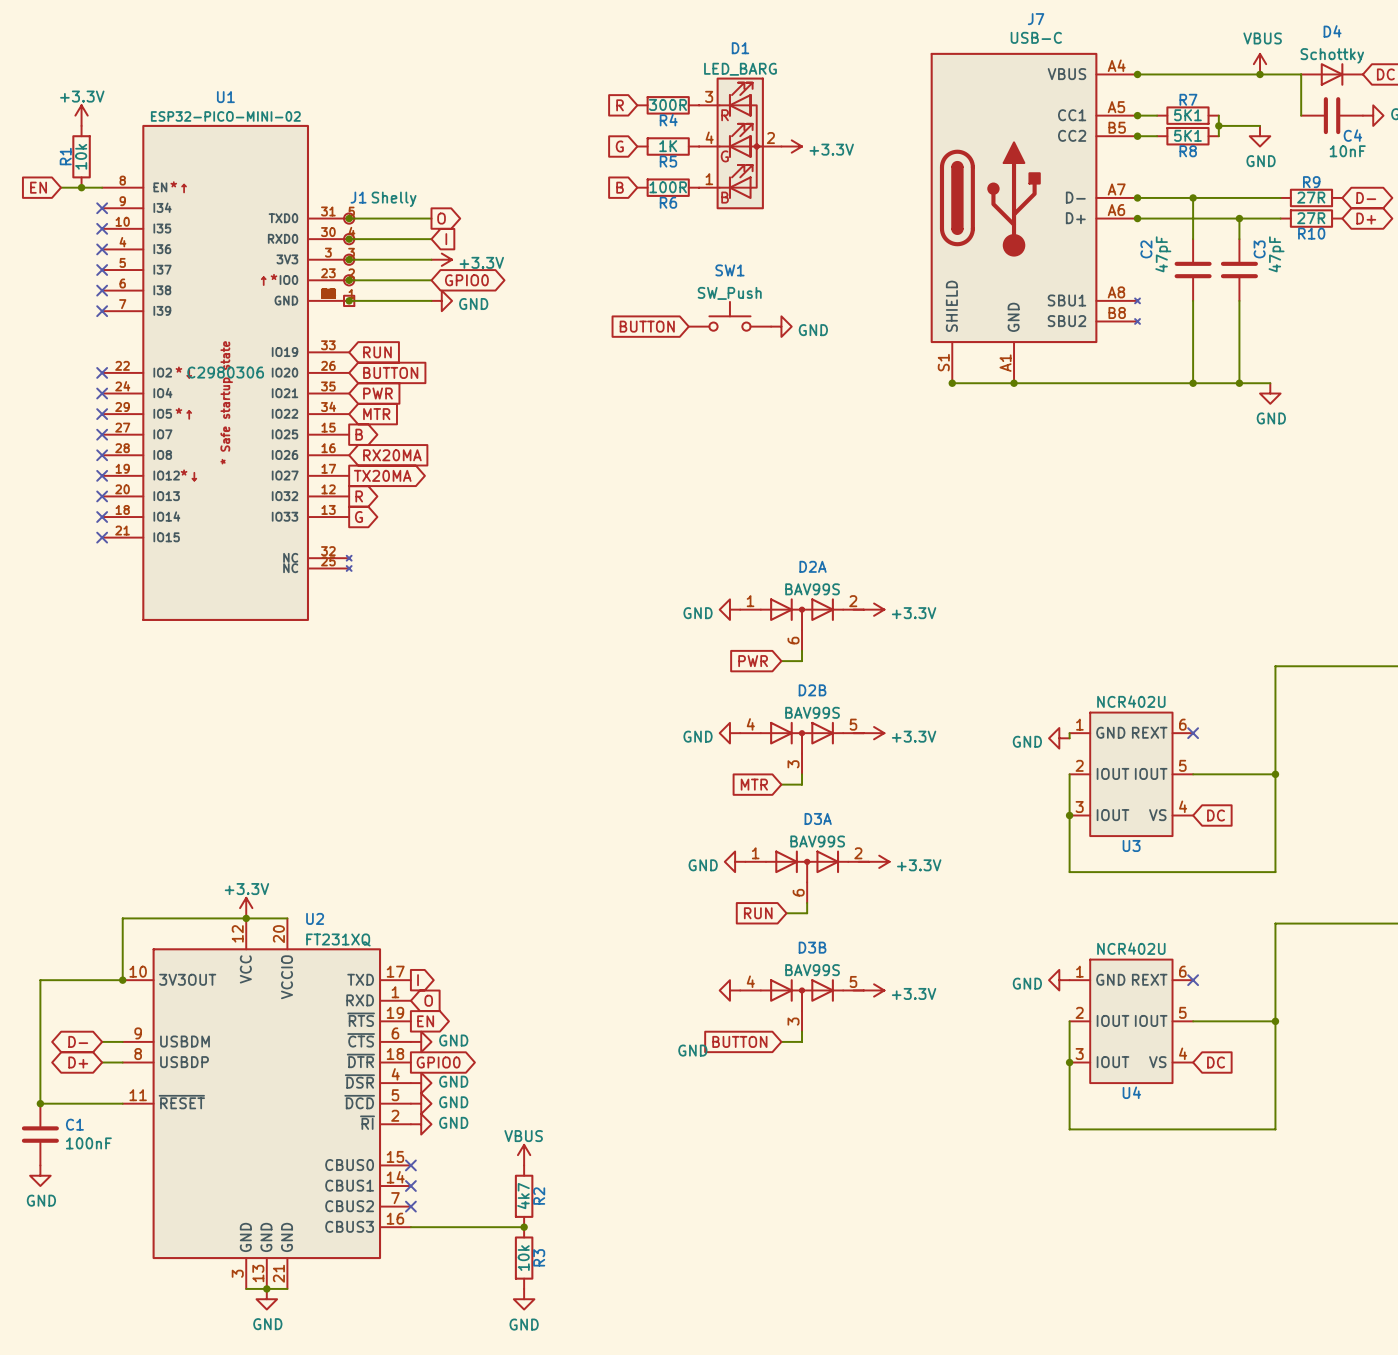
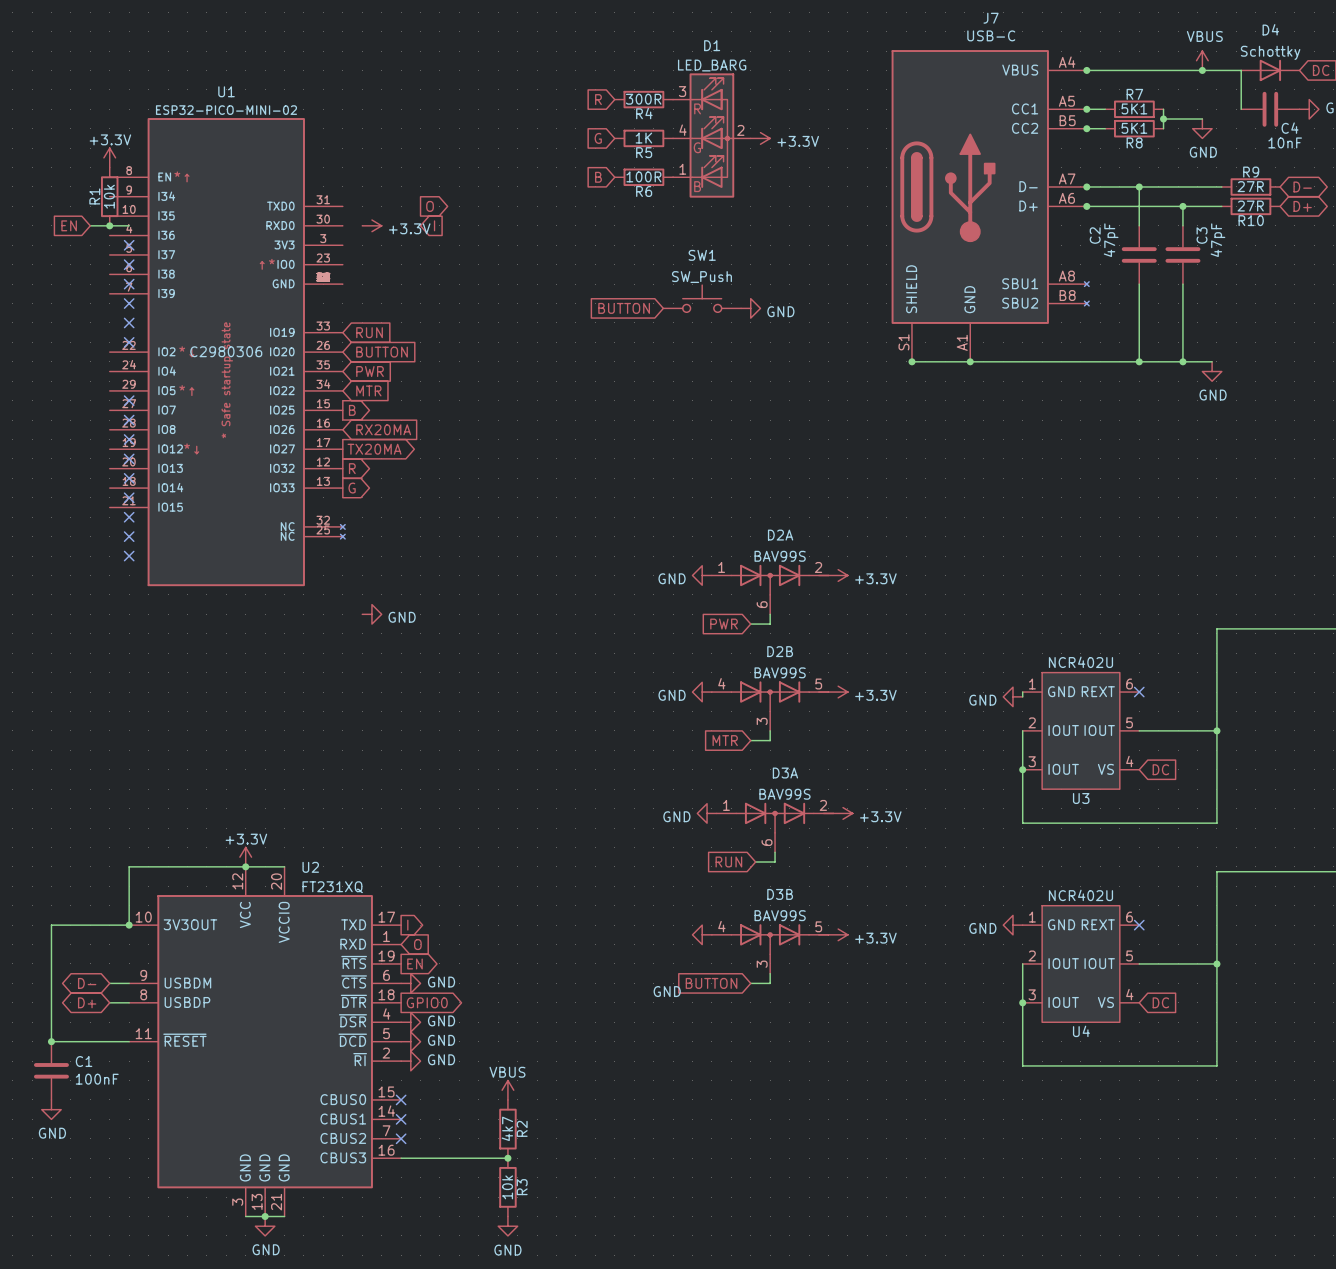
power symbol position: +3.3V (81, 115) -> +3.3V (109, 157)
R1 position: (81, 156) -> (109, 196)
global label position: EN (38, 187) -> EN (69, 225)
wire: (60, 187) (102, 187) -> (90, 225) (129, 225)
junction: (81, 187) -> none
no-connect mark: (102, 208) -> none
wire: (349, 218) (431, 218) -> none
junction: (349, 218) -> none
no-connect mark: (102, 228) -> none
junction: none -> (109, 225)
wire: (349, 239) (431, 239) -> none
junction: (349, 239) -> none
no-connect mark: (102, 249) -> none
no-connect mark: none -> (129, 245)
wire: (349, 259) (431, 259) -> none
junction: (349, 259) -> none
J1: Shelly (349, 259) -> none
power symbol position: +3.3V (441, 259) -> +3.3V (371, 225)
no-connect mark: (102, 270) -> none
no-connect mark: none -> (129, 264)
wire: (349, 280) (431, 280) -> none
junction: (349, 280) -> none
global label: GPIO0 (466, 280) -> none
no-connect mark: (102, 290) -> none
no-connect mark: none -> (129, 284)
wire: (349, 300) (431, 300) -> none
junction: (349, 300) -> none
power symbol: GND (441, 300) -> none
no-connect mark: (102, 311) -> none
no-connect mark: none -> (129, 303)
no-connect mark: none -> (129, 322)
no-connect mark: none -> (129, 342)
no-connect mark: (102, 372) -> none
no-connect mark: (102, 393) -> none
no-connect mark: (102, 414) -> none
no-connect mark: none -> (129, 400)
no-connect mark: (102, 434) -> none
no-connect mark: none -> (129, 420)
no-connect mark: (102, 455) -> none
no-connect mark: none -> (129, 439)
no-connect mark: (102, 475) -> none
no-connect mark: none -> (129, 458)
no-connect mark: (102, 496) -> none
no-connect mark: none -> (129, 478)
no-connect mark: (102, 517) -> none
no-connect mark: none -> (129, 497)
no-connect mark: (102, 537) -> none
no-connect mark: none -> (129, 517)
no-connect mark: none -> (129, 536)
no-connect mark: none -> (129, 556)
power symbol: none -> GND (371, 614)

